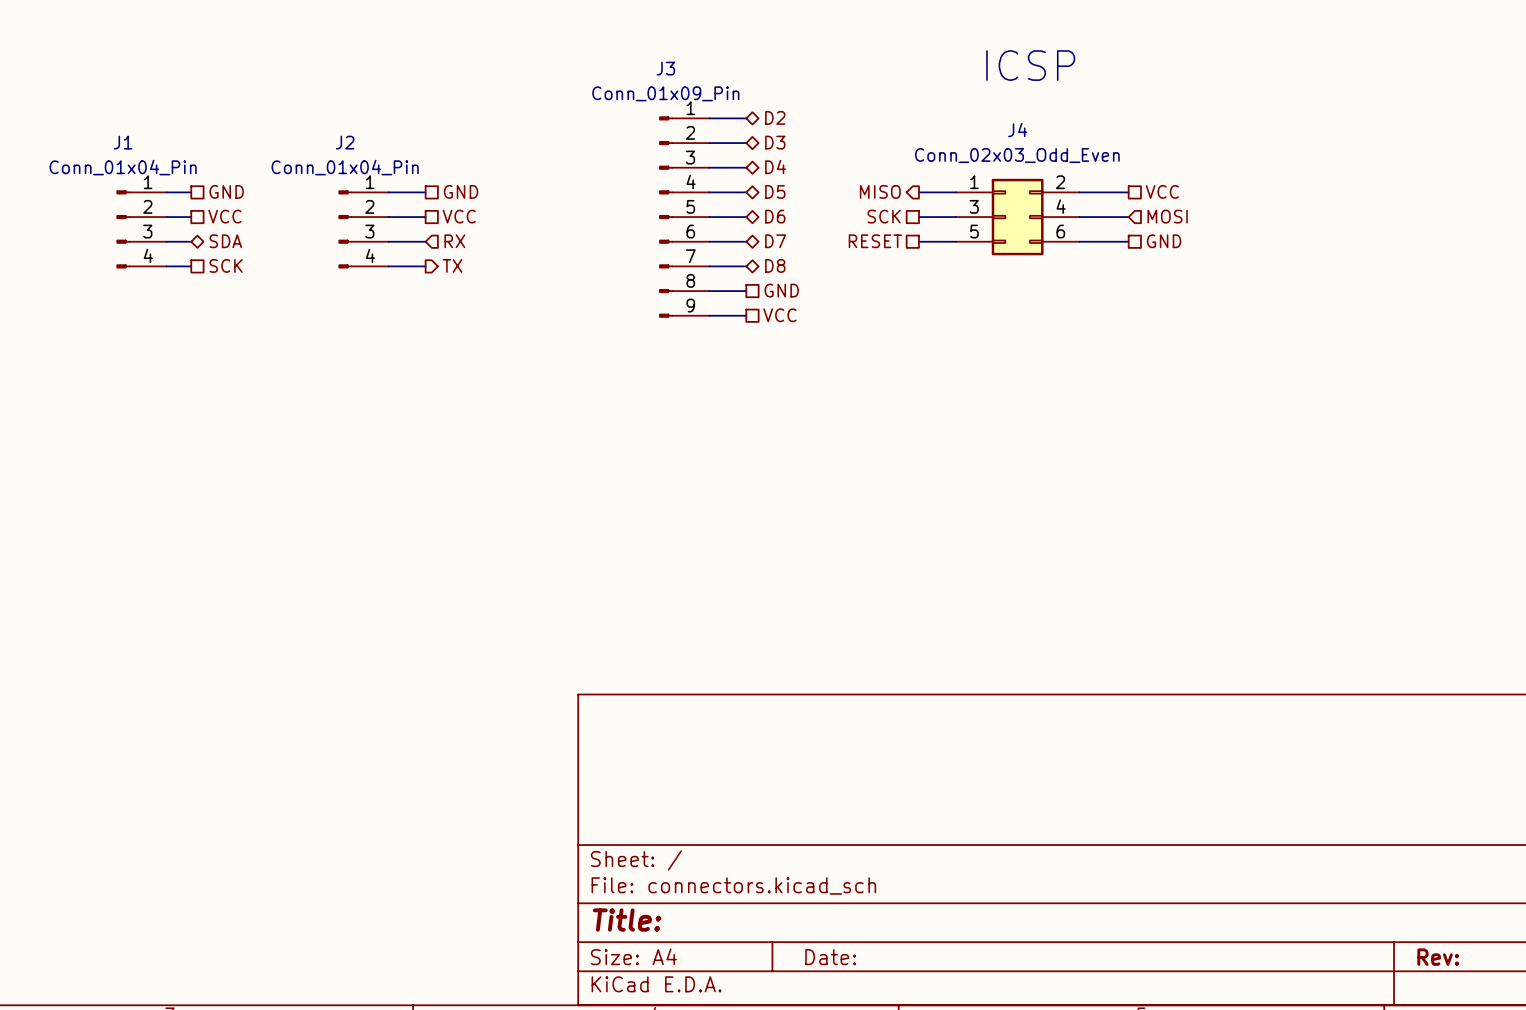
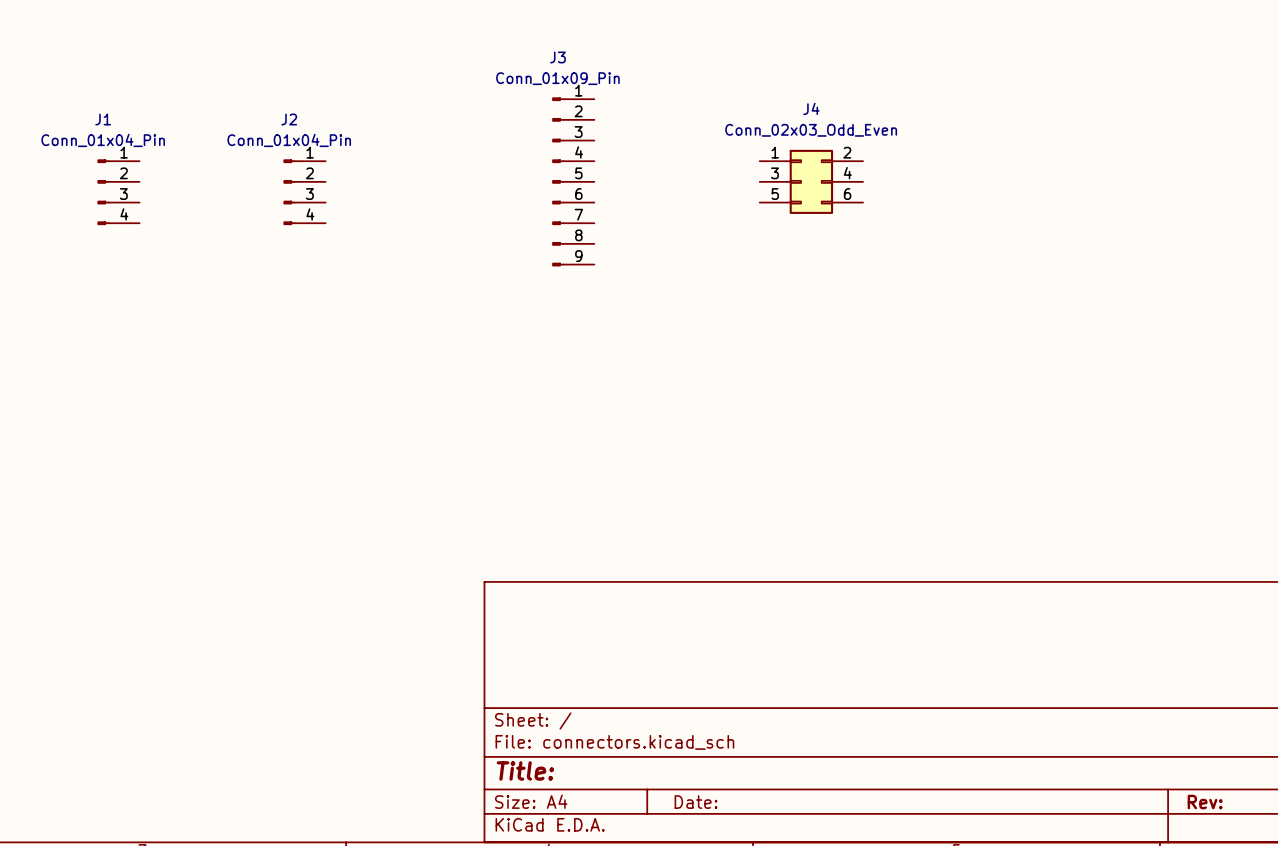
text: ICSP (1030, 65) -> none
hierarchical label: D2 (775, 117) -> none
wire: (709, 118) (746, 118) -> none
hierarchical label: D3 (775, 142) -> none
wire: (709, 143) (746, 143) -> none
hierarchical label: D4 (775, 166) -> none
wire: (709, 167) (746, 167) -> none
hierarchical label: GND (226, 191) -> none
hierarchical label: GND (461, 191) -> none
hierarchical label: D5 (775, 191) -> none
hierarchical label: MISO (880, 191) -> none
hierarchical label: VCC (1162, 191) -> none
wire: (166, 192) (191, 192) -> none
wire: (388, 192) (425, 192) -> none
wire: (709, 192) (746, 192) -> none
wire: (1079, 192) (1128, 192) -> none
hierarchical label: VCC (224, 216) -> none
hierarchical label: VCC (459, 216) -> none
hierarchical label: D6 (775, 216) -> none
hierarchical label: SCK (884, 216) -> none
hierarchical label: MOSI (1167, 216) -> none
wire: (166, 217) (191, 217) -> none
wire: (388, 217) (425, 217) -> none
wire: (709, 217) (746, 217) -> none
J4 position: (1017, 217) -> (811, 181)
wire: (1079, 217) (1128, 217) -> none
wire: (166, 241) (191, 241) -> none
hierarchical label: SDA (225, 241) -> none
wire: (388, 241) (425, 241) -> none
hierarchical label: RX (454, 241) -> none
wire: (709, 241) (746, 241) -> none
hierarchical label: D7 (775, 241) -> none
hierarchical label: RESET (875, 241) -> none
wire: (1079, 241) (1128, 241) -> none
hierarchical label: GND (1164, 241) -> none
hierarchical label: SCK (226, 265) -> none
hierarchical label: TX (452, 265) -> none
hierarchical label: D8 (775, 265) -> none
wire: (166, 266) (191, 266) -> none
wire: (388, 266) (425, 266) -> none
wire: (709, 266) (746, 266) -> none
hierarchical label: GND (781, 290) -> none
wire: (709, 291) (746, 291) -> none
wire: (709, 315) (746, 315) -> none
hierarchical label: VCC (779, 315) -> none

